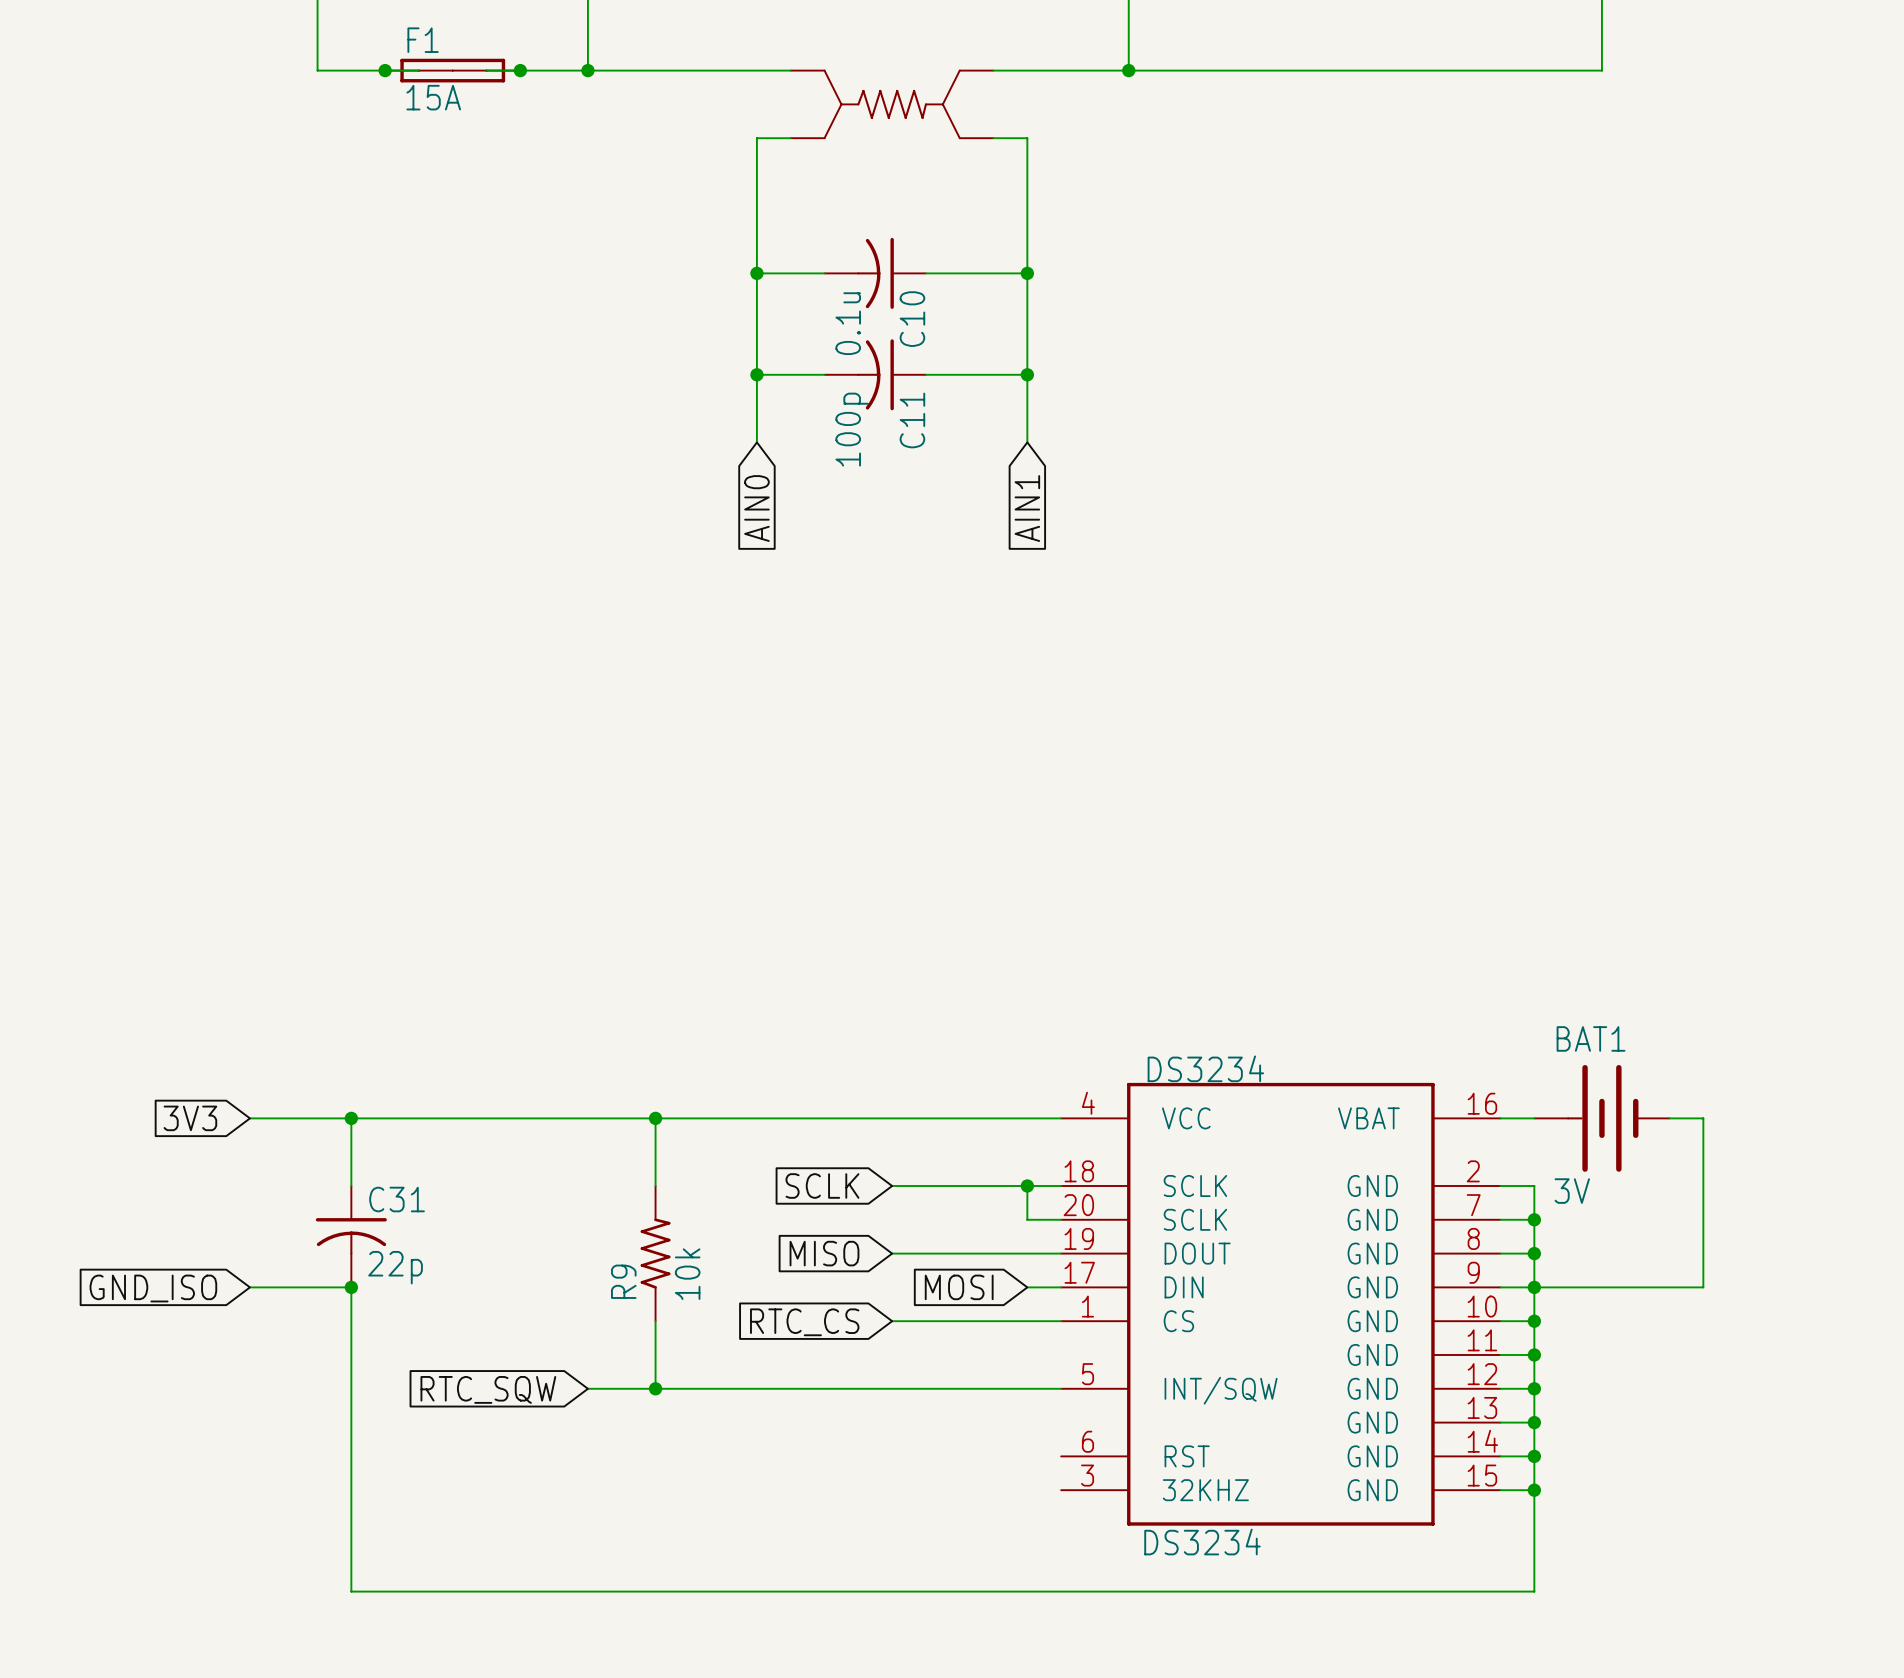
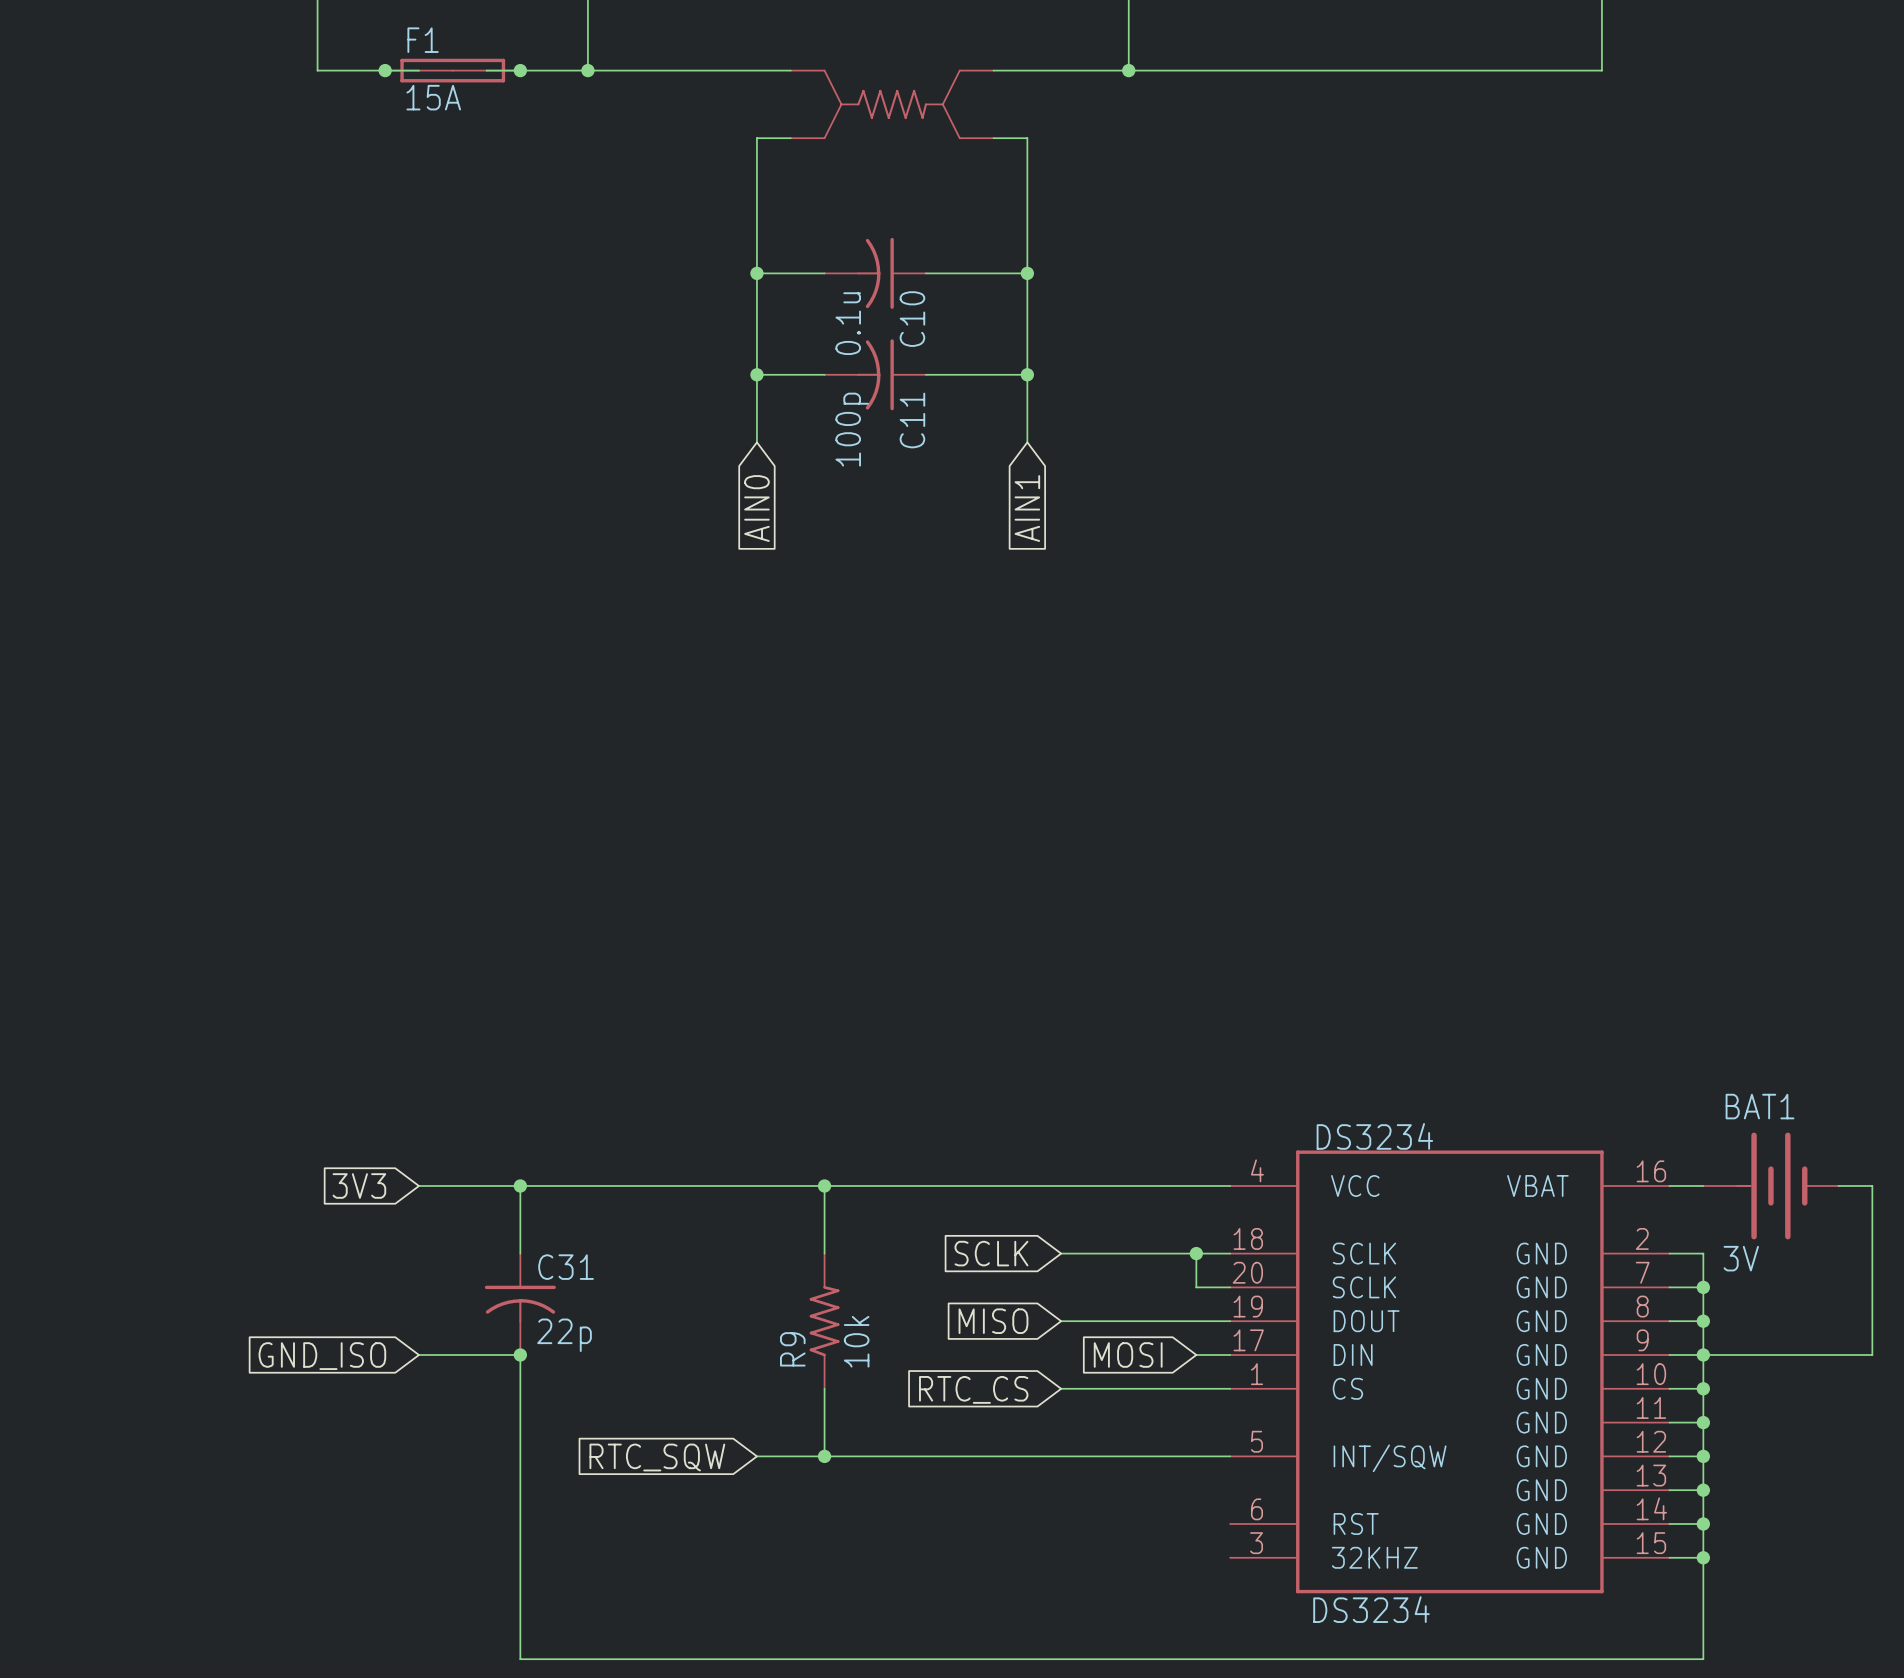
global label position: 3V3 (190, 1118) -> 3V3 (359, 1185)
wire: (249, 1118) (1061, 1118) -> none
wire: (351, 1118) (351, 1185) -> (520, 1185) (520, 1253)
junction: (351, 1118) -> none
wire: (655, 1118) (655, 1185) -> (824, 1185) (824, 1253)
junction: (655, 1118) -> none
wire: (1500, 1118) (1534, 1118) -> (1669, 1185) (1703, 1185)
BAT1 position: (1601, 1118) -> (1770, 1185)
wire: (1669, 1118) (1703, 1118) (1703, 1253) -> (1669, 1253) (1703, 1253)
wire: none -> (418, 1185) (892, 1185)
junction: none -> (520, 1185)
global label position: SCLK (822, 1185) -> SCLK (991, 1253)
junction: none -> (824, 1185)
wire: (1027, 1185) (1027, 1219) (1061, 1219) -> (1196, 1253) (1196, 1287) (1230, 1287)
junction: (1027, 1185) -> none
wire: none -> (1061, 1185) (1230, 1185)
wire: (1500, 1185) (1534, 1185) (1534, 1591) (351, 1591) (351, 1287) (249, 1287) -> none
wire: none -> (1838, 1185) (1872, 1185) (1872, 1354) (1669, 1354)
wire: (1500, 1219) (1534, 1219) -> none
junction: (1534, 1219) -> none
C31 position: (351, 1236) -> (520, 1304)
R9 position: (655, 1253) -> (824, 1321)
global label position: MISO (824, 1253) -> MISO (993, 1321)
wire: (892, 1253) (1061, 1253) -> (1230, 1253) (1061, 1253)
junction: none -> (1196, 1253)
wire: (1500, 1253) (1534, 1253) -> (1669, 1321) (1703, 1321)
junction: (1534, 1253) -> none
junction: (351, 1287) -> none
global label position: MOSI (959, 1287) -> MOSI (1128, 1354)
wire: (1027, 1287) (1061, 1287) -> (1196, 1354) (1230, 1354)
wire: (1500, 1287) (1669, 1287) -> none
junction: (1534, 1287) -> none
wire: none -> (1703, 1287) (1703, 1659) (520, 1659) (520, 1354) (418, 1354)
junction: none -> (1703, 1287)
global label position: GND_ISO (153, 1288) -> GND_ISO (322, 1356)
DS3234 position: (1280, 1304) -> (1449, 1371)
wire: (655, 1321) (655, 1388) -> (824, 1388) (824, 1456)
wire: (892, 1321) (1061, 1321) -> (1230, 1321) (1061, 1321)
wire: (1500, 1321) (1534, 1321) -> (1669, 1388) (1703, 1388)
junction: (1534, 1321) -> none
junction: none -> (1703, 1321)
global label position: RTC_CS (804, 1322) -> RTC_CS (973, 1389)
junction: none -> (520, 1354)
wire: (1500, 1354) (1534, 1354) -> (1669, 1422) (1703, 1422)
junction: (1534, 1354) -> none
junction: none -> (1703, 1354)
wire: (587, 1388) (1061, 1388) -> (1230, 1388) (1061, 1388)
junction: (655, 1388) -> none
wire: (1500, 1388) (1534, 1388) -> (1669, 1456) (1703, 1456)
junction: (1534, 1388) -> none
junction: none -> (1703, 1388)
global label position: RTC_SQW (488, 1389) -> RTC_SQW (657, 1457)
wire: (1500, 1422) (1534, 1422) -> (1669, 1490) (1703, 1490)
junction: (1534, 1422) -> none
junction: none -> (1703, 1422)
wire: none -> (756, 1456) (1230, 1456)
junction: none -> (824, 1456)
wire: (1500, 1456) (1534, 1456) -> (1669, 1523) (1703, 1523)
junction: (1534, 1456) -> none
junction: none -> (1703, 1456)
wire: (1500, 1490) (1534, 1490) -> (1669, 1557) (1703, 1557)
junction: (1534, 1490) -> none
junction: none -> (1703, 1490)
junction: none -> (1703, 1523)
junction: none -> (1703, 1557)

